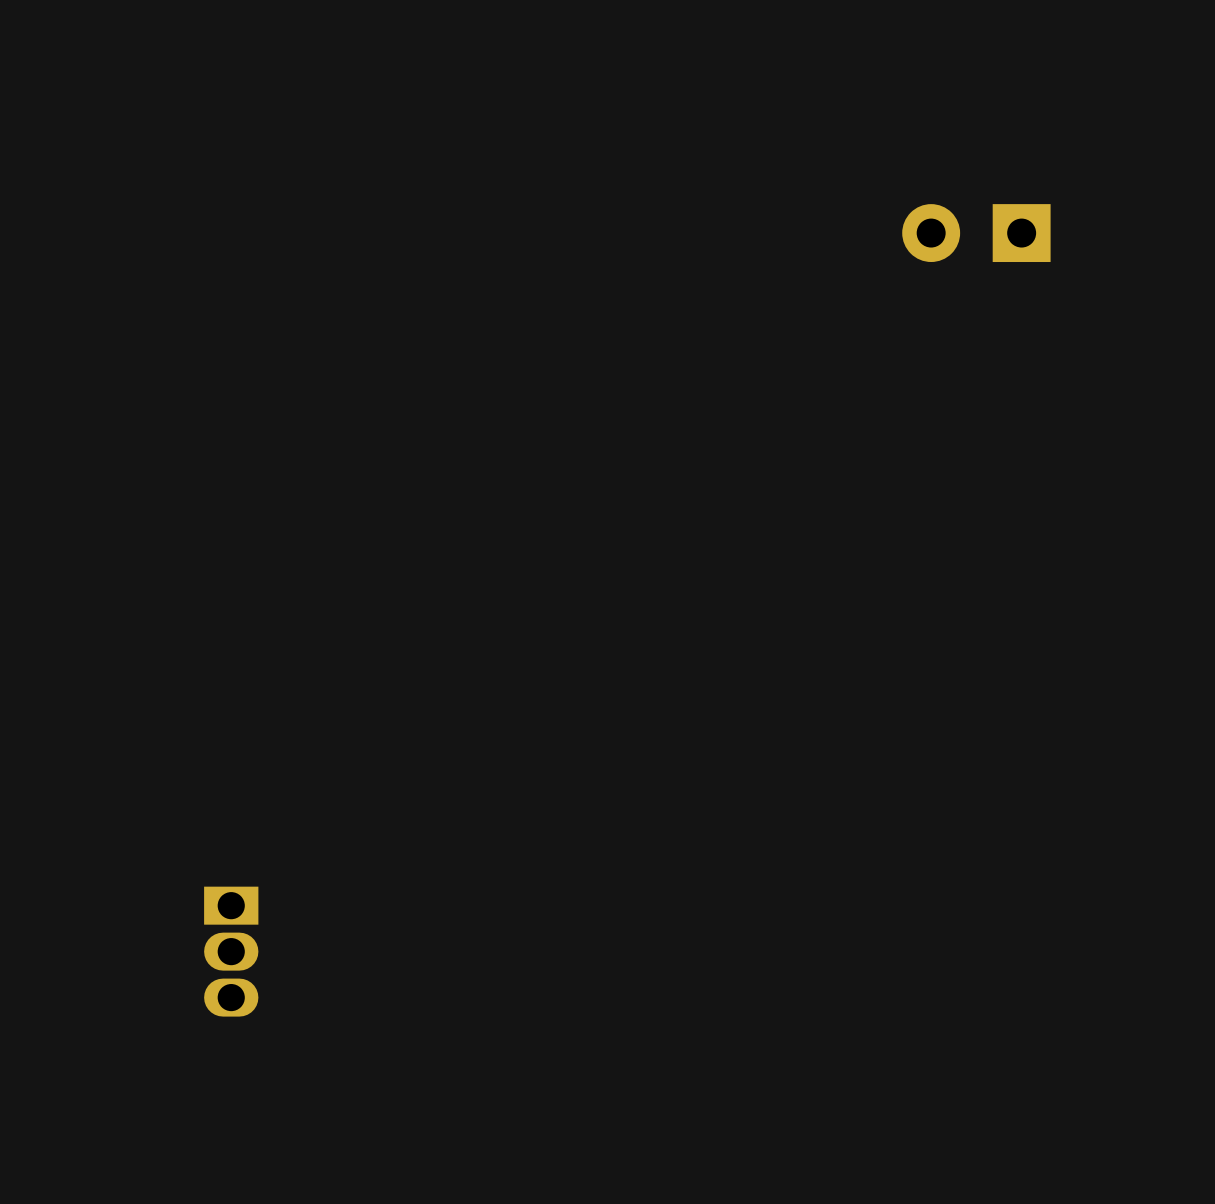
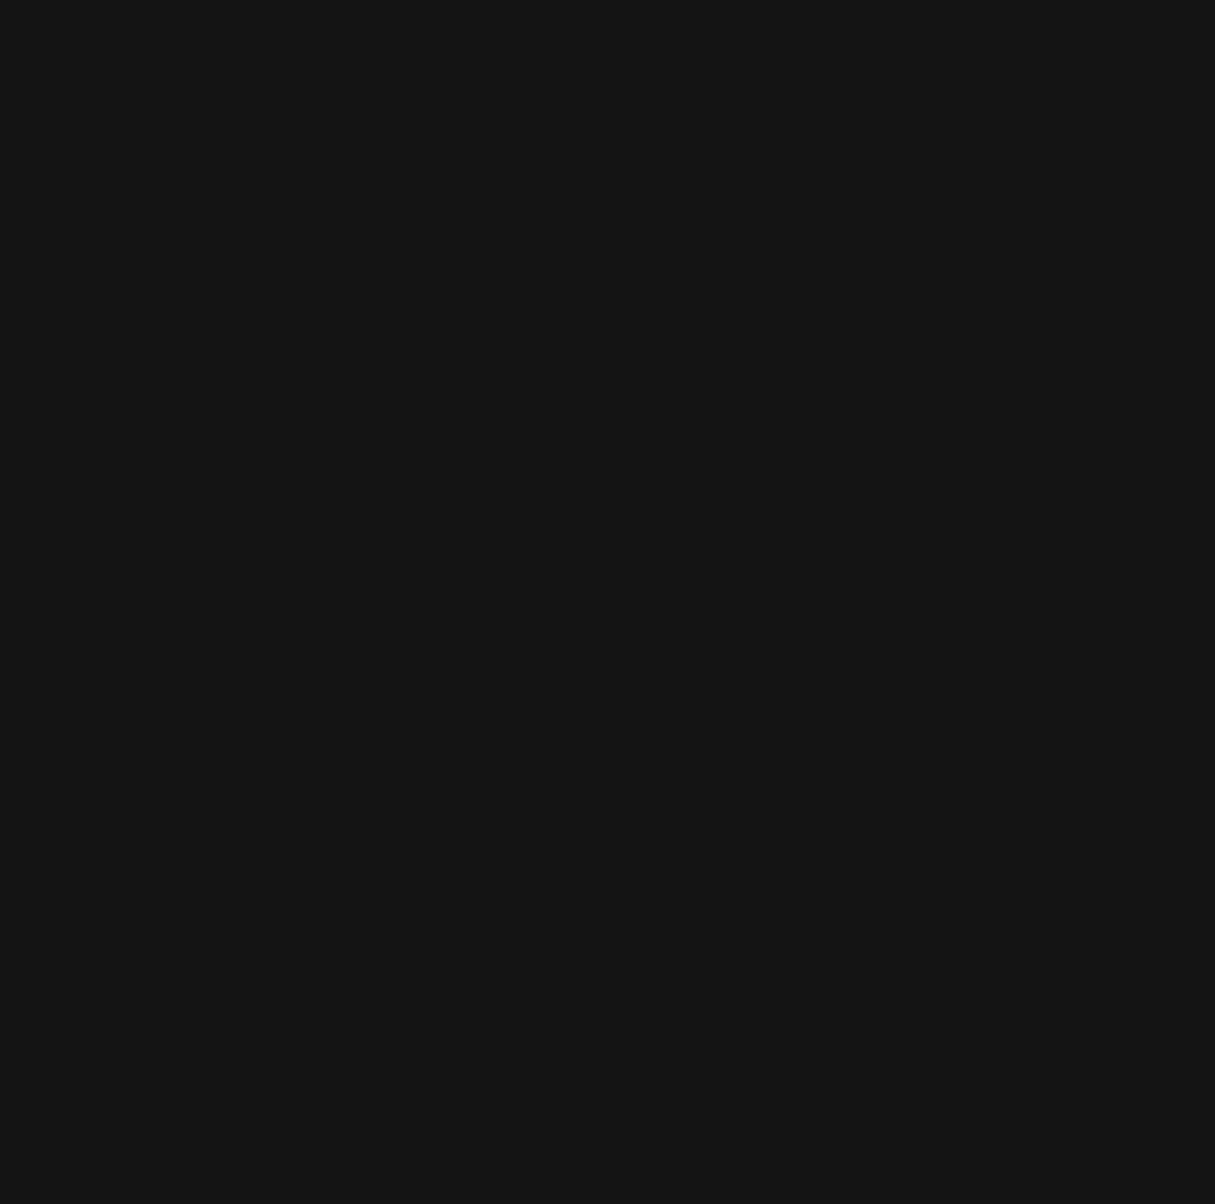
part: (976, 233) -> none
part: (231, 951) -> none

